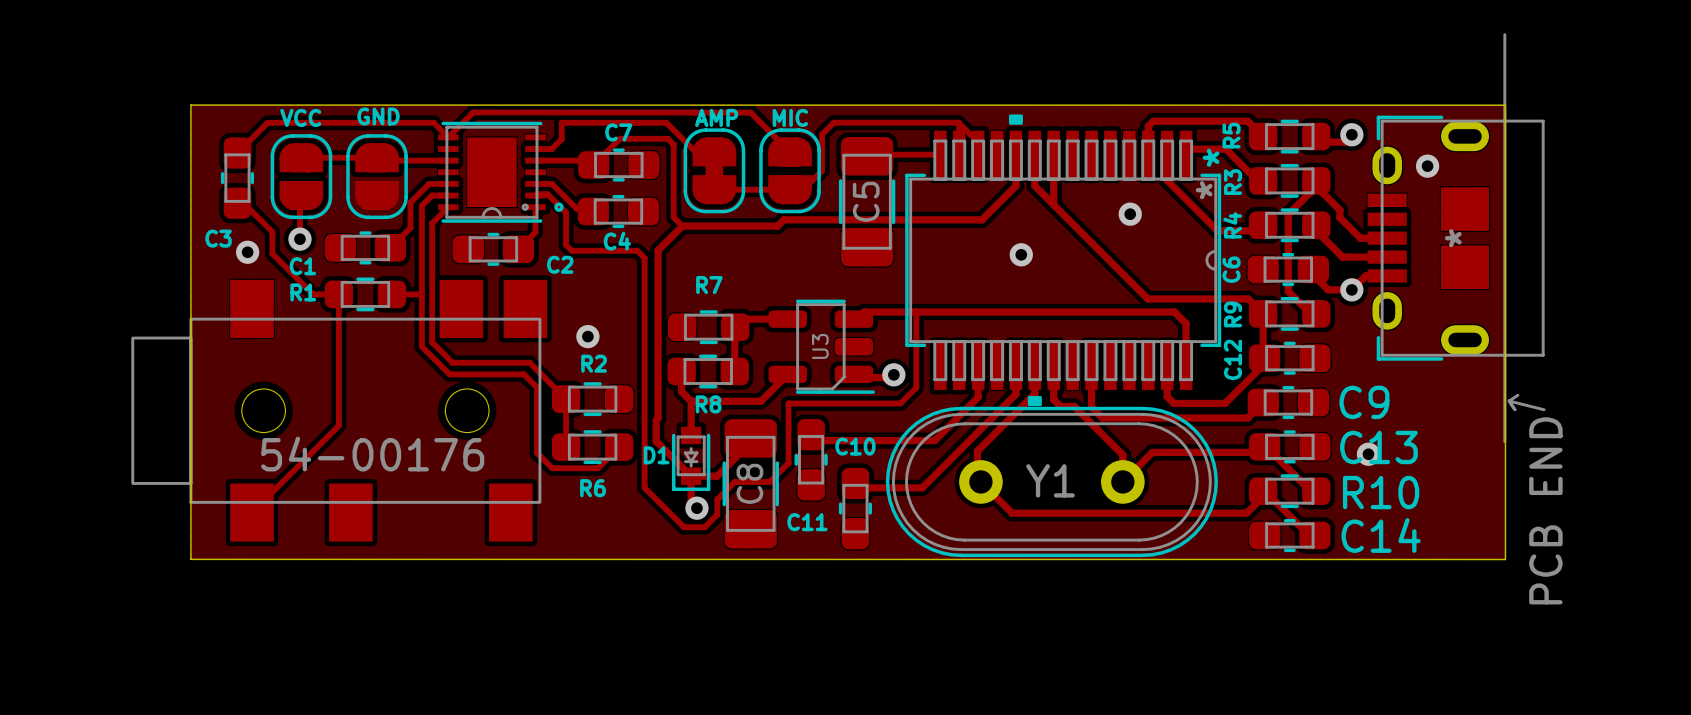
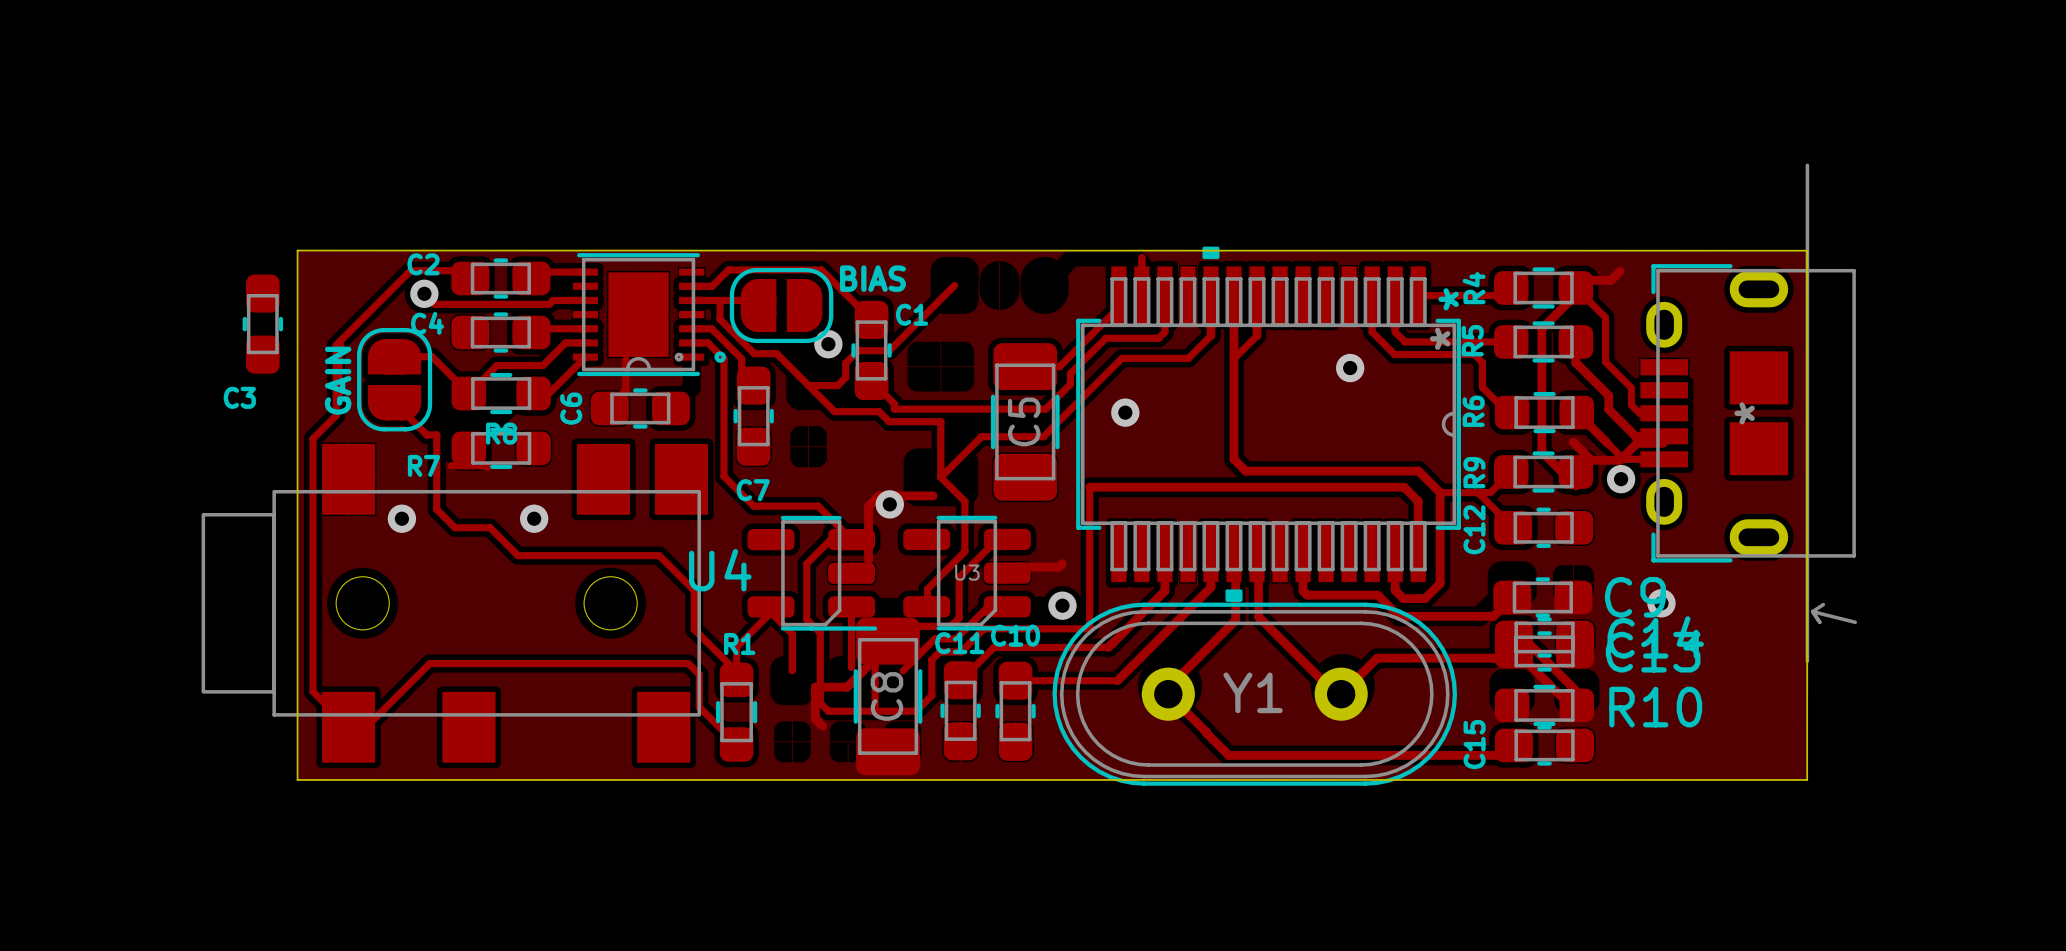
track: (693, 112) (473, 112) (448, 137) (433, 122) (267, 122) (237, 153) -> none
track: (694, 112) (750, 112) (790, 151) -> none
board edge: (1505, 117) (1505, 105) (190, 105) (190, 559) (1505, 559) (1505, 552) -> (1807, 250) (297, 250) (297, 779) (1807, 779)
C7 name position: C7 (618, 132) -> C7 (753, 490)
track: none -> (462, 270) (410, 270) (336, 345) (336, 415) (313, 438) (313, 691) (348, 727)
via: (1351, 134) -> none
track: none -> (537, 272) (585, 272)
track: (1263, 136) (1247, 121) (1153, 121) (1148, 126) (1148, 154) -> (1507, 412) (1482, 387) (1482, 362) (1474, 354) (1394, 354) (1372, 332) (1372, 295)
R5 position: (1289, 136) -> (1543, 341)
text: none -> BIAS (872, 278)
track: none -> (954, 285) (889, 350) (858, 350) (845, 363) (845, 377) (837, 385) (808, 385)
track: none -> (691, 286) (712, 286) (728, 269) (821, 269) (871, 319)
track: none -> (1575, 287) (1605, 317) (1605, 362) (1631, 387) (1631, 405) (1639, 413) (1664, 413)
track: (535, 149) (551, 149) (561, 139) (561, 122) (666, 122) (695, 151) (714, 151) -> none
track: (1186, 149) (1225, 149) (1263, 186) -> none
track: none -> (424, 293) (434, 304) (549, 304) (553, 300) (585, 300)
via: none -> (424, 293)
track: none -> (1575, 294) (1541, 328) (1541, 451) (1575, 485)
track: (940, 154) (868, 154) (867, 156) -> none
track: (978, 154) (978, 142) (958, 122) (833, 122) (822, 134) (822, 170) (803, 189) (714, 189) -> (1164, 295) (1164, 332) (1158, 338) (1105, 338) (1070, 373) (1070, 384) (1045, 409) (894, 409) (894, 403) (871, 381)
track: none -> (1418, 295) (1503, 295)
track: (301, 157) (448, 160) -> none
track: none -> (691, 300) (748, 300)
track: none -> (720, 300) (720, 319) (754, 353) (776, 353) (834, 411) (879, 411) (889, 421) (940, 421) (940, 477)
track: (535, 160) (589, 160) (593, 165) (619, 138) (667, 138) (673, 144) (673, 217) (682, 226) -> none
part: none -> (781, 305)
track: none -> (1118, 307) (1059, 366) (1025, 366)
C7 rotation: 0° (618, 165) -> 90° clockwise (753, 416)
C7 position: (618, 165) -> (753, 416)
via: (1427, 166) -> none
AMP: (714, 170) -> none
MIC: (790, 170) -> none
part position: (500, 172) -> (649, 314)
VCC: (301, 176) -> none
GND: (377, 176) -> none
track: (1167, 180) (1217, 230) (1263, 230) -> (1395, 326) (1395, 332) (1405, 341) (1511, 341)
R3: (1289, 180) -> none
track: none -> (535, 328) (585, 328)
track: none -> (691, 328) (711, 328) (741, 358) (741, 373)
track: (448, 183) (429, 183) (410, 202) (410, 227) (390, 247) -> none
track: (535, 183) (551, 183) (576, 208) (591, 208) -> none
track: (1015, 185) (982, 219) (783, 219) (777, 226) (682, 226) -> (1210, 333) (1188, 358) (1121, 358) (1043, 436) (981, 436) (940, 477)
track: (1034, 185) (1147, 298) (1248, 298) (1263, 313) -> (1234, 333) (1234, 459) (1245, 471) (1418, 471) (1440, 492)
track: (1053, 187) (1053, 204) -> (1257, 335) (1234, 358)
track: none -> (1575, 341) (1575, 362) (1608, 395) (1608, 409) (1635, 436) (1664, 436)
track: none -> (585, 342) (565, 342) (542, 365) (496, 365) (468, 393) (432, 356) (394, 356)
track: none -> (691, 342) (708, 342) (724, 358) (724, 476) (753, 506) (818, 506) (851, 539) (830, 539) (806, 563) (806, 619) (820, 632) (820, 703) (828, 711) (916, 711) (931, 695) (931, 659) (939, 651) (961, 651) (984, 628) (1089, 628)
via: none -> (828, 344)
track: (448, 195) (432, 195) (421, 205) (421, 346) (449, 374) (523, 374) (537, 387) (537, 452) (552, 468) (597, 468) (619, 447) -> none
track: (535, 195) (547, 194) (566, 212) (566, 244) (571, 250) (637, 250) (644, 258) (644, 487) (683, 527) (704, 527) (717, 514) (717, 499) (734, 482) (769, 482) (788, 463) (788, 403) (900, 403) (916, 387) -> (1089, 628) (1089, 579)
C5 position: (867, 201) -> (1025, 421)
track: (237, 203) (243, 203) (272, 231) (272, 253) (313, 294) (338, 294) (338, 425) (252, 512) -> none
track: none -> (585, 357) (549, 393) (533, 393)
track: (448, 207) (432, 223) (432, 342) (452, 362) (529, 362) (566, 399) (566, 447) -> none
C4 position: (618, 211) -> (500, 332)
part: none -> (394, 379)
text: none -> GAIN (338, 380)
R4 position: (1289, 225) -> (1543, 287)
track: (682, 226) (658, 250) (658, 418) (656, 419) (656, 441) (691, 476) -> none
track: (1316, 230) (1342, 257) (1387, 257) -> none
track: (1387, 238) (1360, 238) (1339, 217) (1339, 210) (1316, 186) (1288, 214) (1288, 291) (1316, 319) -> none
part position: (1456, 238) -> (1748, 413)
via: (299, 239) -> none
C4 name position: C4 (617, 241) -> C4 (427, 323)
track: none -> (394, 402) (426, 434) (436, 434) (436, 509) (455, 527) (490, 527) (517, 555) (659, 555) (694, 590) (694, 629) (734, 669)
C1 rotation: 0° (365, 247) -> 90° clockwise (871, 350)
C1 position: (365, 247) -> (871, 350)
C2 position: (493, 249) -> (500, 278)
via: none -> (1125, 412)
track: none -> (1576, 412) (1623, 459) (1664, 459)
via: (247, 252) -> none
via: (1021, 254) -> none
C2 name position: C2 (560, 264) -> C2 (423, 264)
C1 name position: C1 (302, 266) -> C1 (912, 314)
C6 position: (1288, 269) -> (640, 408)
R7 name position: R7 (709, 285) -> R7 (423, 465)
via position: (1351, 289) -> (1621, 479)
R1 rotation: 0° (365, 294) -> 90° clockwise (736, 712)
R1 position: (365, 294) -> (736, 712)
track: none -> (1511, 471) (1490, 492) (1440, 492)
track: none -> (940, 477) (964, 501) (964, 551) (927, 589) (927, 612)
track: (916, 312) (864, 312) (853, 322) -> none
R9 position: (1289, 313) -> (1543, 471)
track: none -> (1477, 492) (1513, 527)
track: (1263, 319) (1264, 363) (1225, 403) (1191, 403) -> (1440, 492) (1440, 583) (1425, 598)
via: none -> (889, 504)
R7 position: (708, 327) -> (501, 448)
via: (587, 336) -> none
via: none -> (401, 518)
via: none -> (534, 518)
U3 name rotation: 0° (820, 346) -> 90° clockwise (967, 572)
U3 position: (821, 346) -> (968, 573)
track: none -> (1235, 530) (1235, 620) (1169, 686)
track: none -> (997, 539) (959, 577) (959, 617) (950, 626) (895, 626) (875, 646) (875, 711)
track: (1034, 354) (1034, 393) (977, 451) (977, 481) -> none
track: (1053, 354) (1053, 399) (1060, 406) (1074, 406) (1122, 454) (1122, 481) -> none
C12 position: (1289, 358) -> (1543, 527)
track: none -> (1258, 544) (1258, 616) (1327, 686)
track: (681, 371) (681, 391) (691, 401) -> none
R8 position: (708, 371) -> (501, 393)
track: (787, 374) (760, 401) (691, 401) -> none
via position: (893, 374) -> (1062, 605)
U4: none -> (812, 573)
track: (1091, 397) (1091, 407) (1102, 418) (1170, 418) -> (1303, 591) (1307, 595) (1377, 595) (1398, 616)
R2: (592, 399) -> none
track: (691, 401) (691, 435) -> none
part: none -> (454, 603)
part: 54-00176 (339, 410) -> none
track: none -> (988, 606) (955, 638) (934, 638) (903, 670)
track: none -> (851, 612) (851, 667)
track: (811, 434) (817, 440) (934, 440) -> (961, 680) (993, 647) (1108, 647) (1112, 643)
track: none -> (1522, 637) (1576, 691)
R6 position: (592, 447) -> (1544, 412)
via position: (1368, 454) -> (1661, 603)
D1: (691, 458) -> none
C11 position: (811, 459) -> (960, 710)
track: none -> (736, 669) (736, 647) (770, 612) (792, 634) (792, 670)
track: (939, 470) (922, 487) (852, 487) -> (1117, 680) (1015, 680)
R6 name rotation: 0° (592, 488) -> 90° counterclockwise (1473, 411)
R6 name position: R6 (592, 488) -> R6 (1473, 411)
via: (696, 508) -> none
C10 position: (855, 508) -> (1015, 711)
track: none -> (366, 727) (429, 663) (688, 663) (699, 674) (699, 707) (736, 744)
part text: PCB END (1545, 510) -> none
track: (1012, 513) (1246, 513) (1263, 496) (1270, 496) (1314, 541) -> (1206, 732) (1228, 755) (1504, 755)
C11 name position: C11 (807, 522) -> C11 (959, 643)
C15: none -> (1544, 745)
C14 position: (1289, 535) -> (1544, 637)

